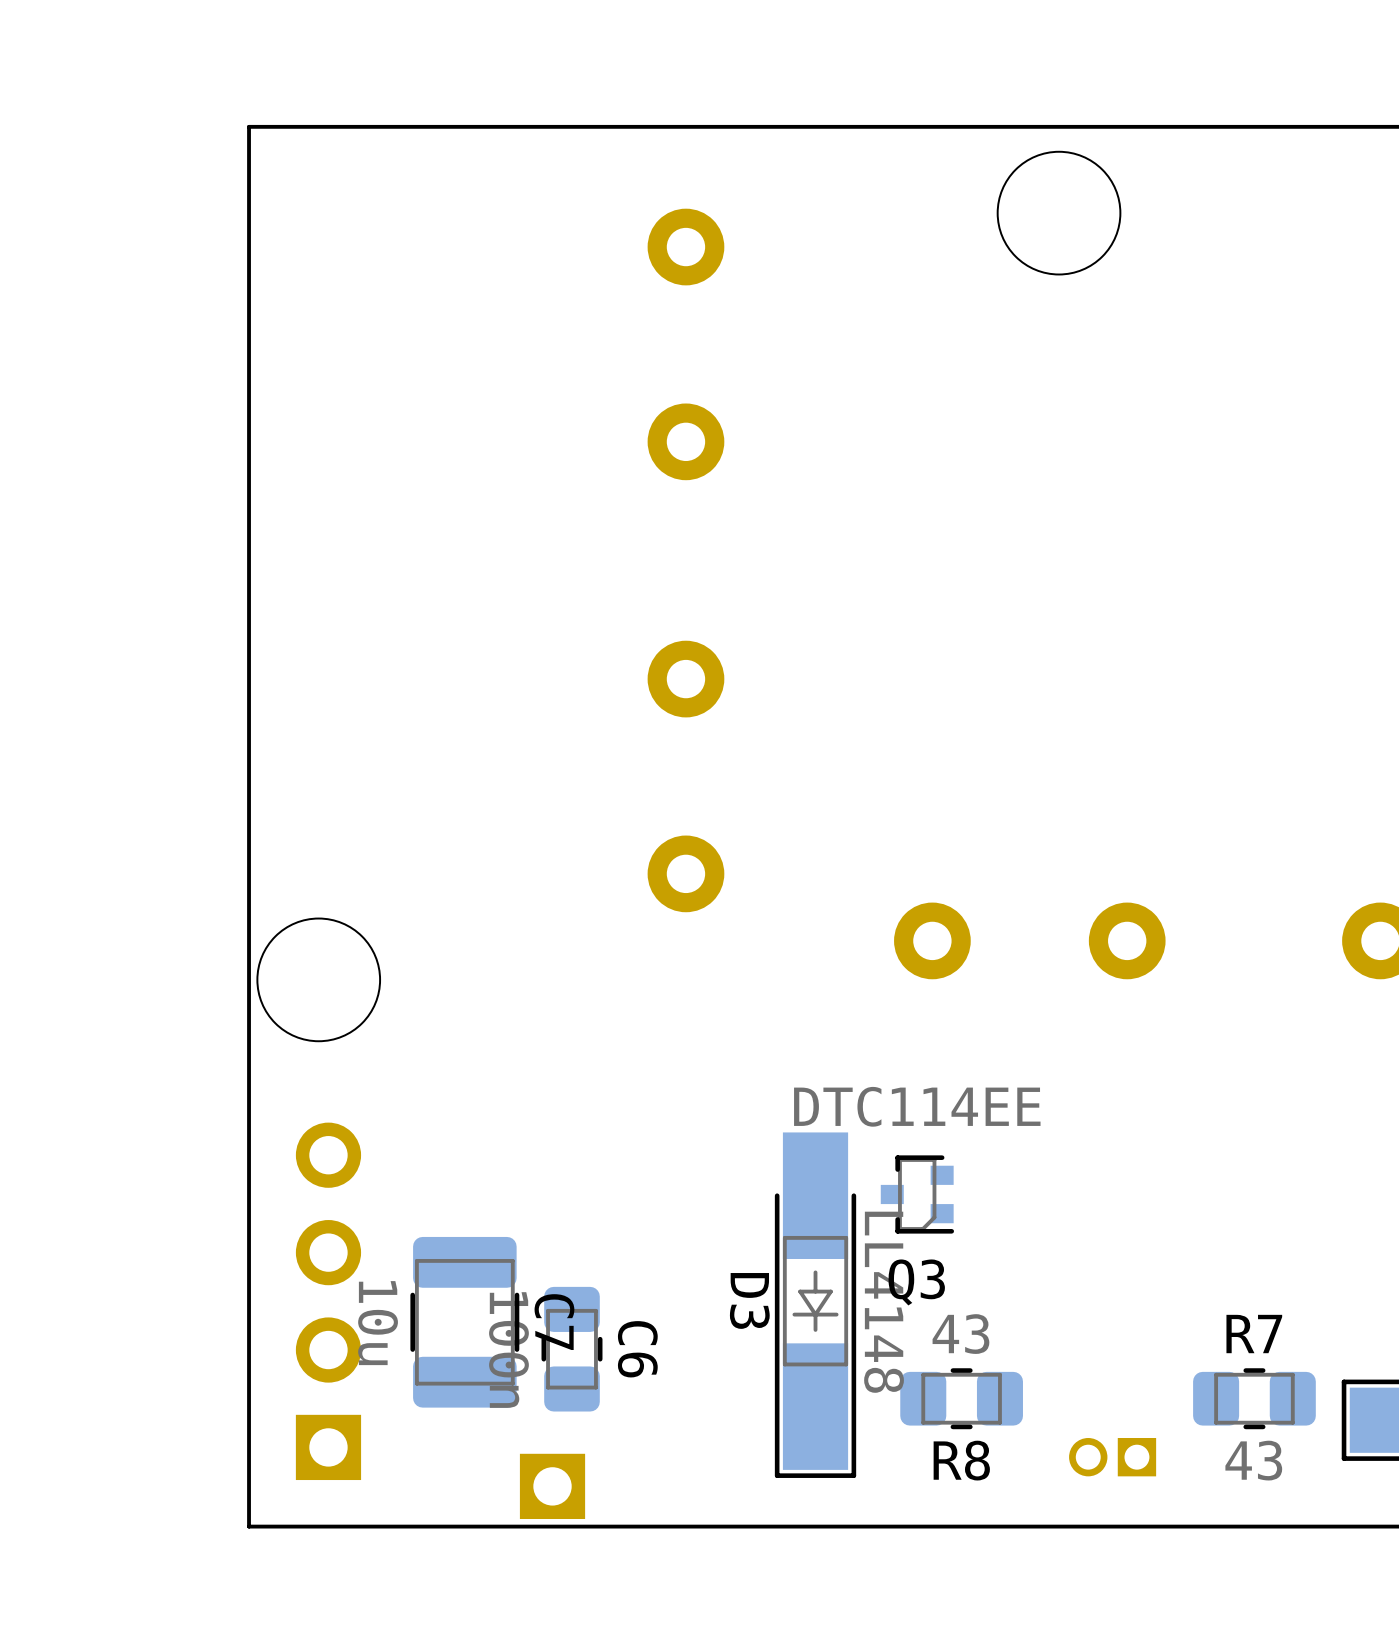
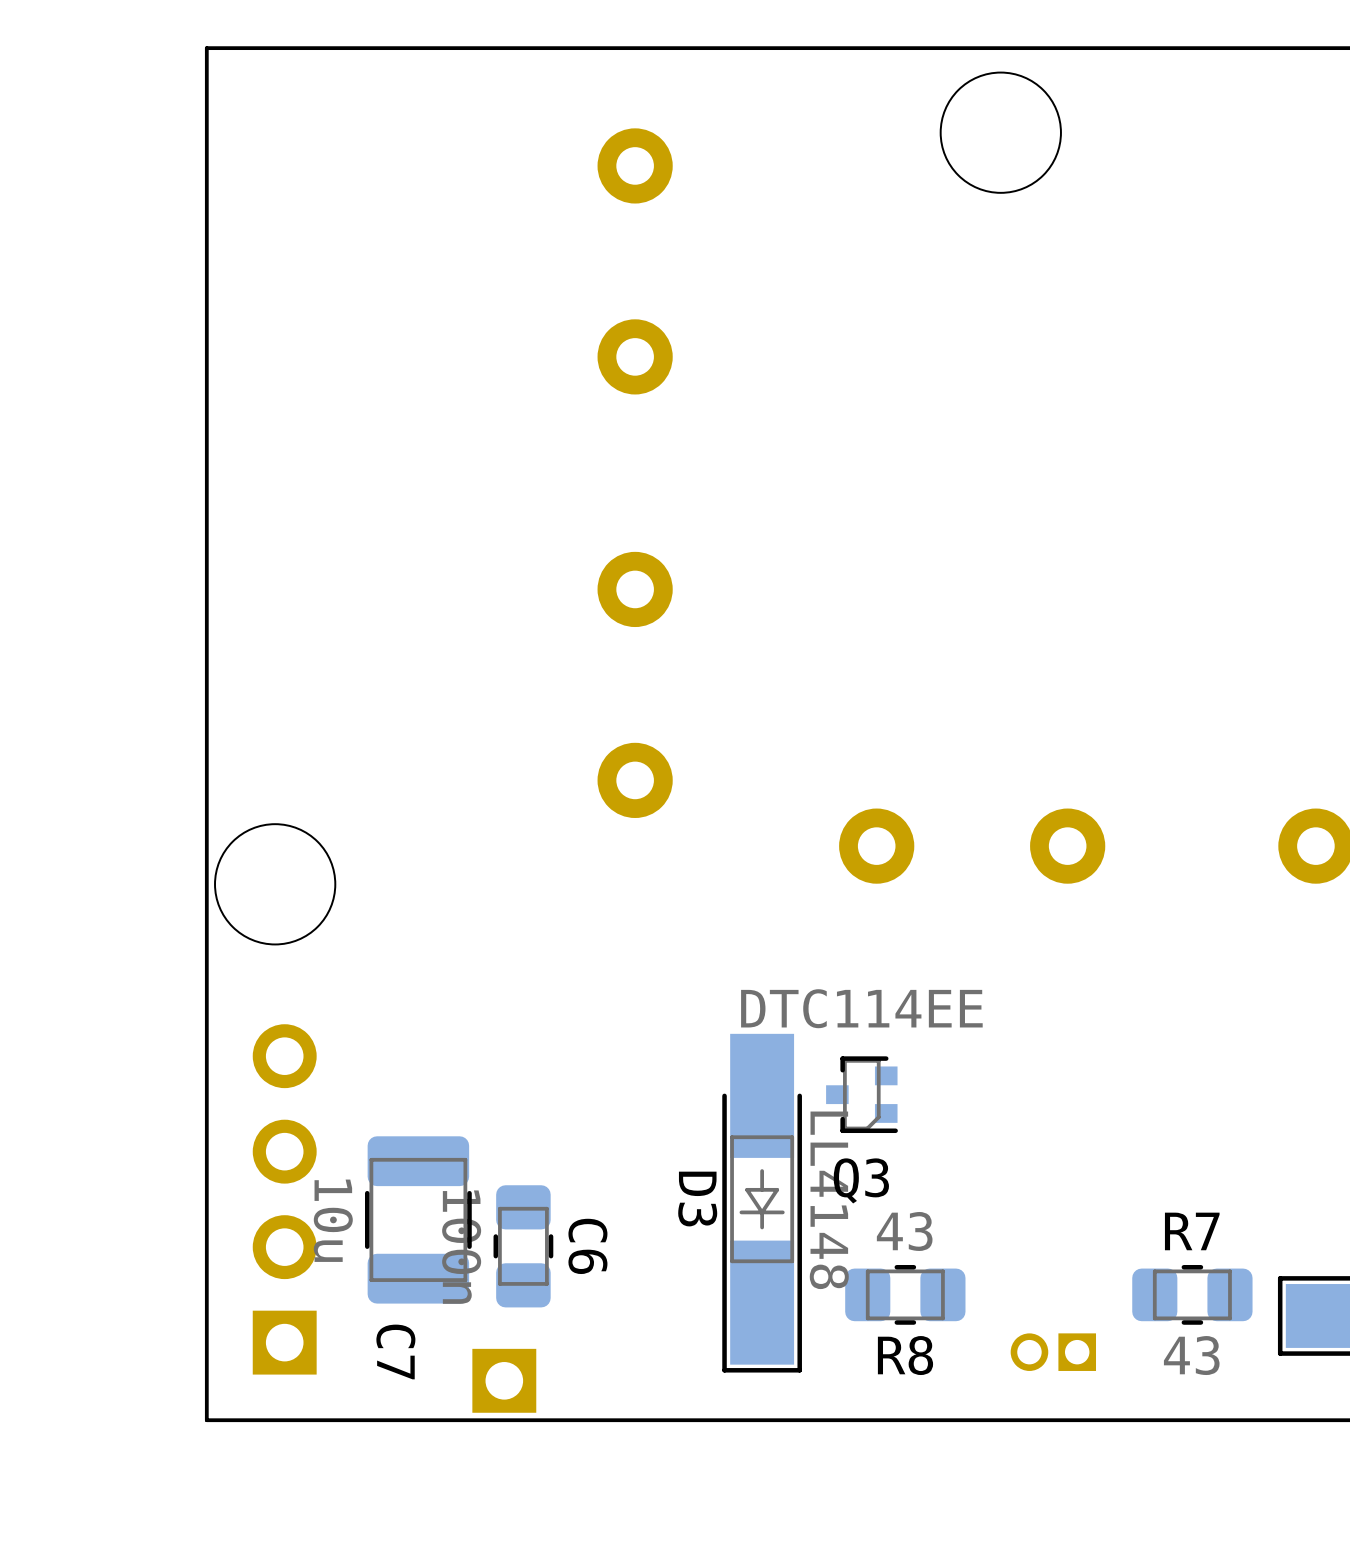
C7 name position: C7 (554, 1322) -> C7 (395, 1351)

